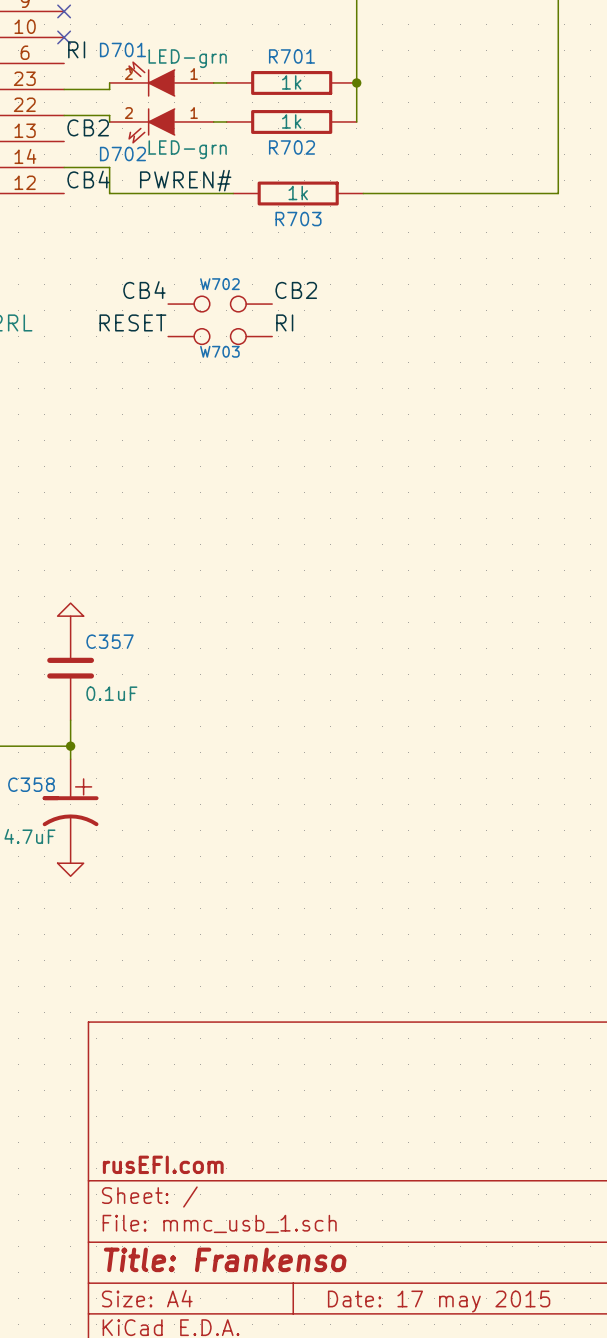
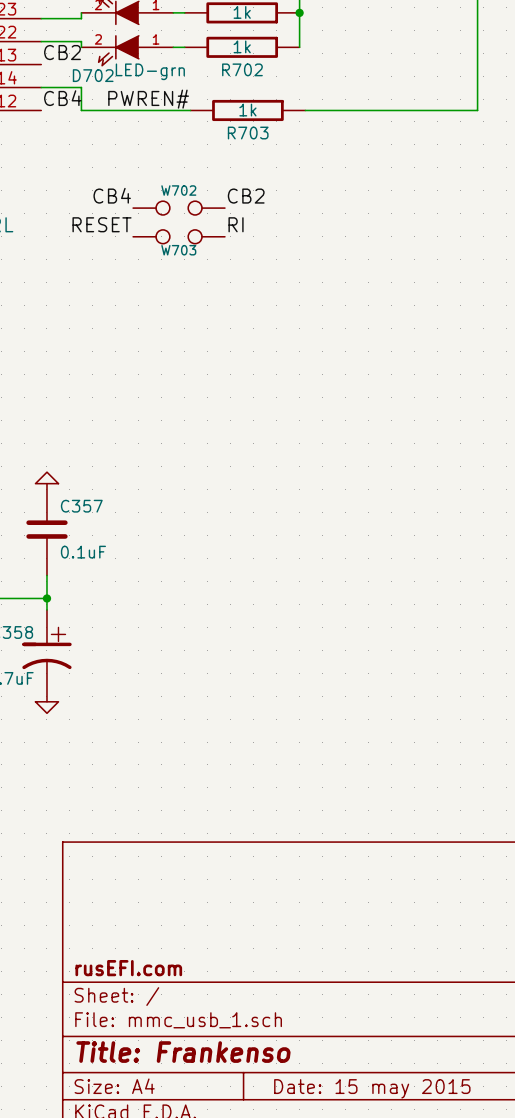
title block: Date: 17 may 2015 (439, 1301) -> Date: 15 may 2015 (372, 1088)

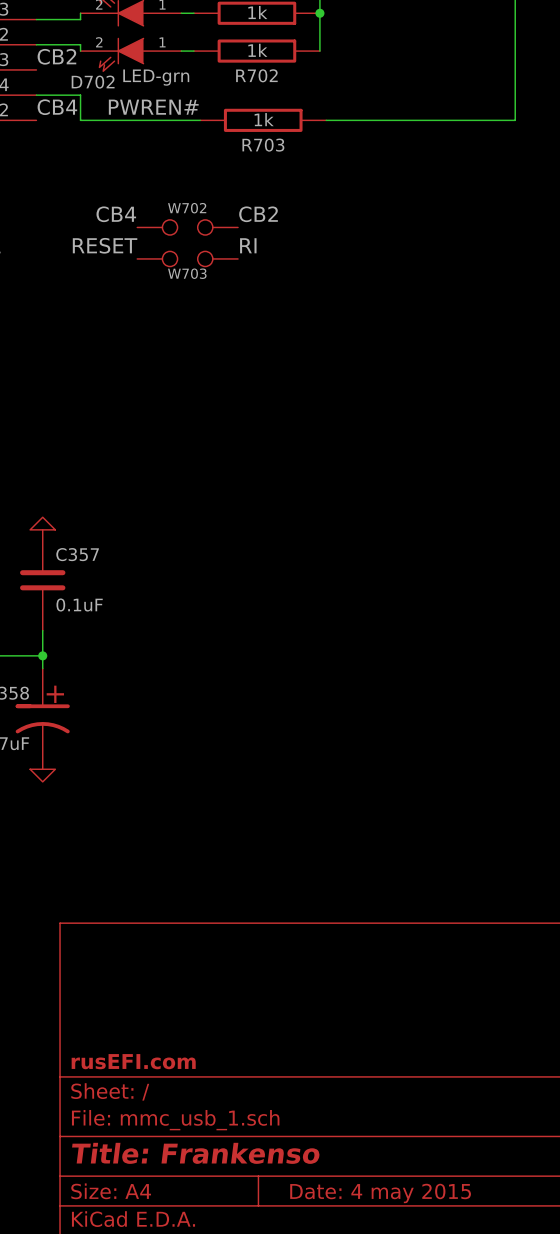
title block: Date: 15 may 2015 (372, 1088) -> Date: 4 may 2015 (380, 1193)

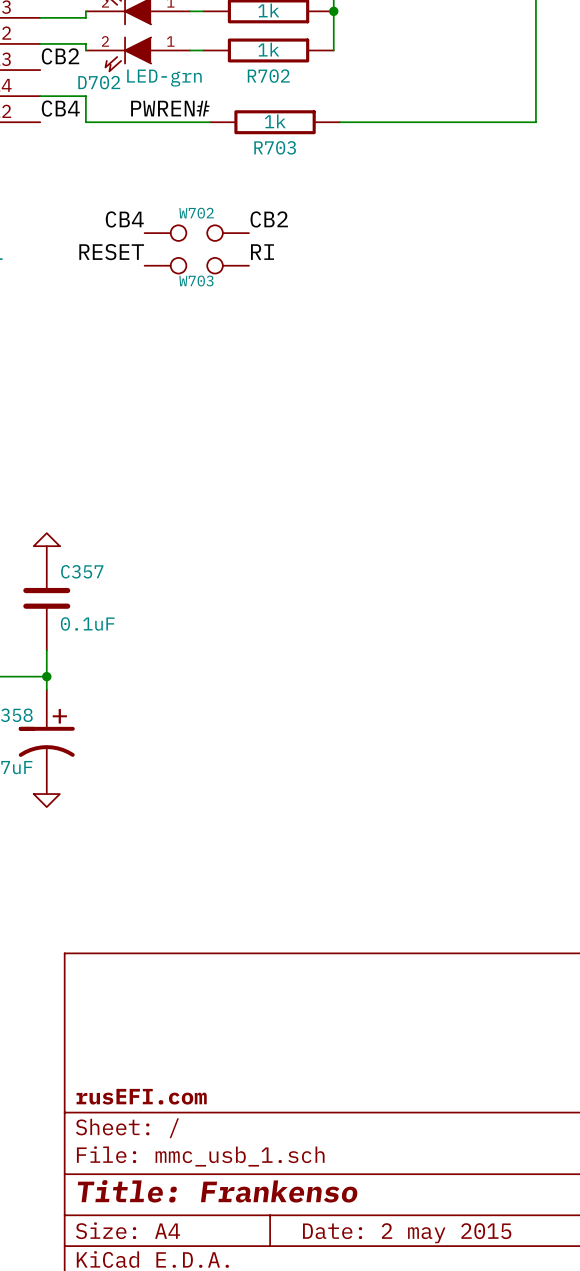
title block: Date: 4 may 2015 (380, 1193) -> Date: 2 may 2015 (407, 1233)

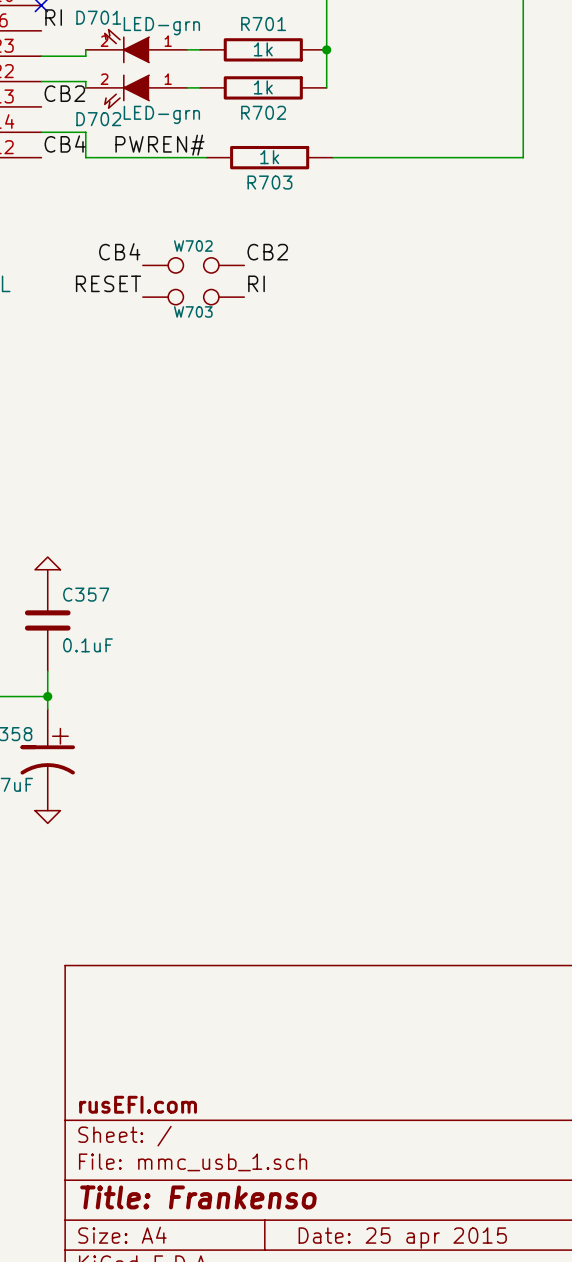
title block: Date: 2 may 2015 (407, 1233) -> Date: 25 apr 2015 (402, 1238)

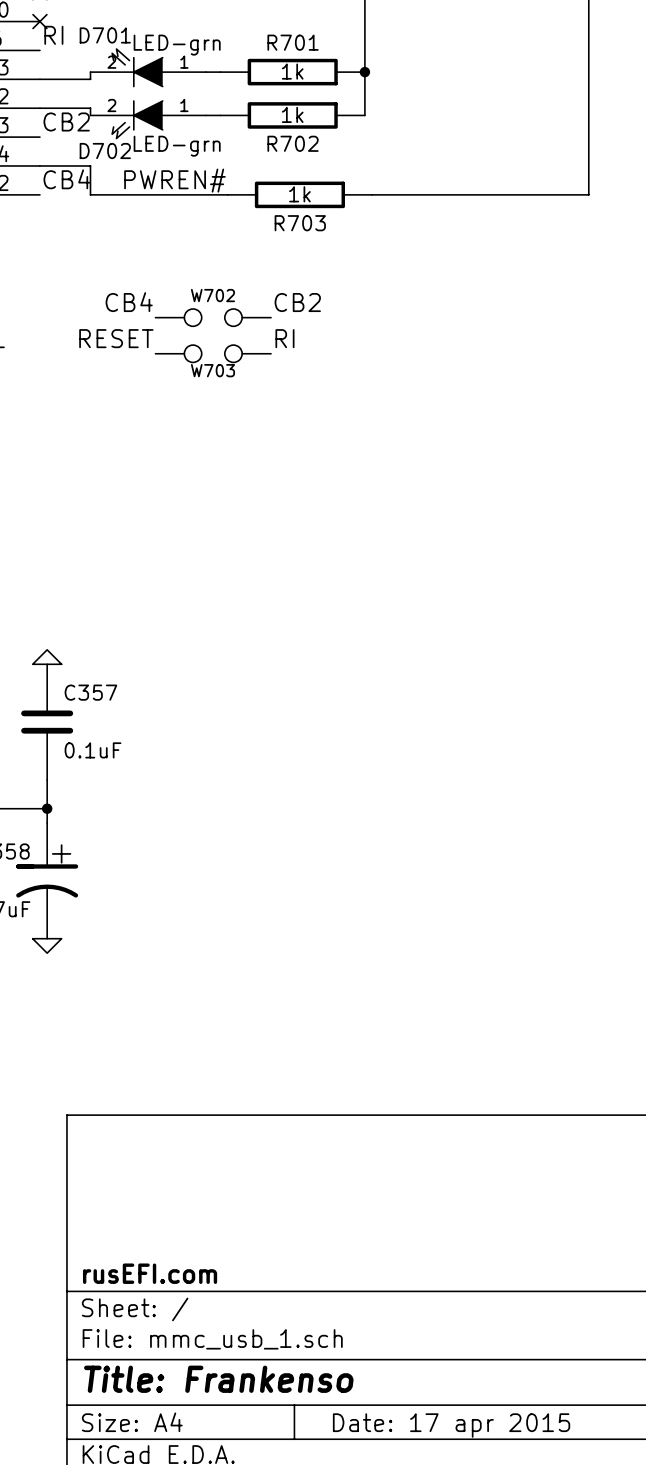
title block: Date: 25 apr 2015 (402, 1238) -> Date: 17 apr 2015 (451, 1425)

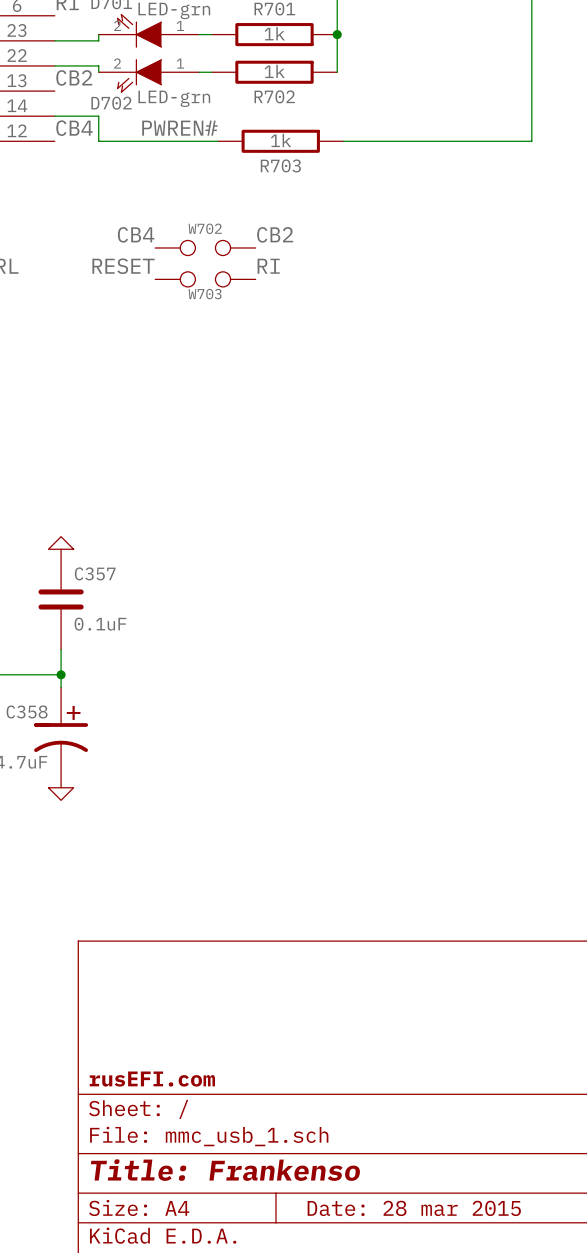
title block: Date: 17 apr 2015 (451, 1425) -> Date: 28 mar 2015 (414, 1208)

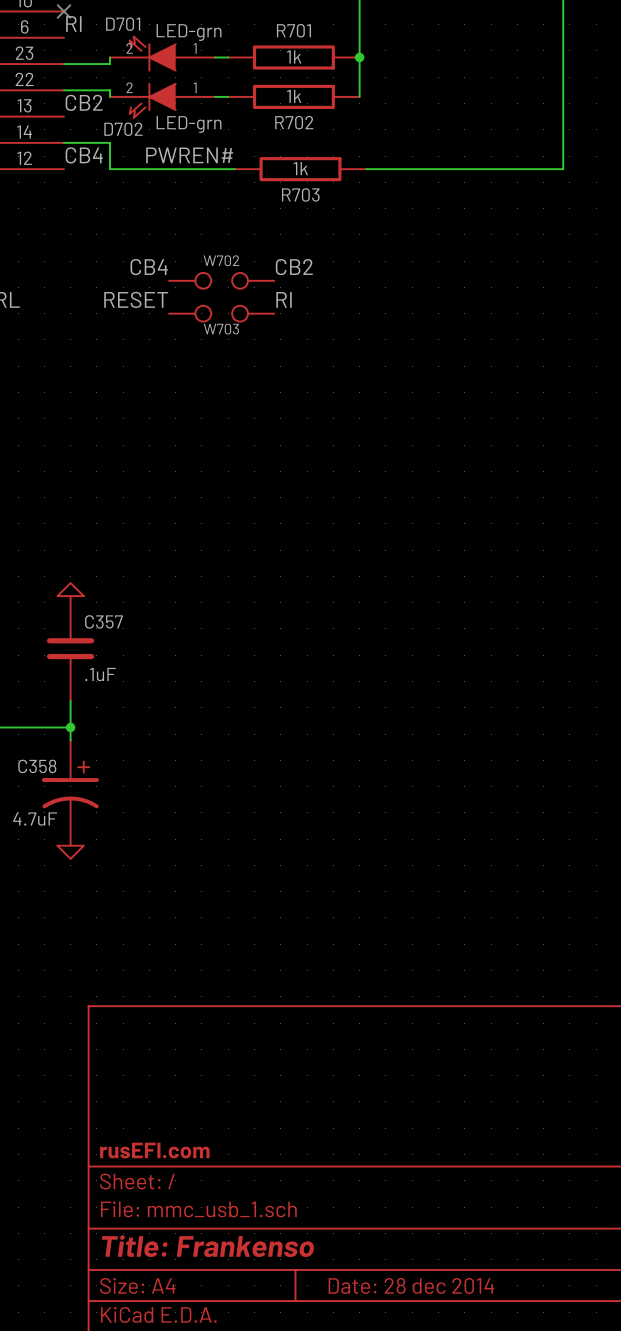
C357 value: 0.1uF (100, 624) -> .1uF (100, 674)
title block: Date: 28 mar 2015 (414, 1208) -> Date: 28 dec 2014 (411, 1285)

